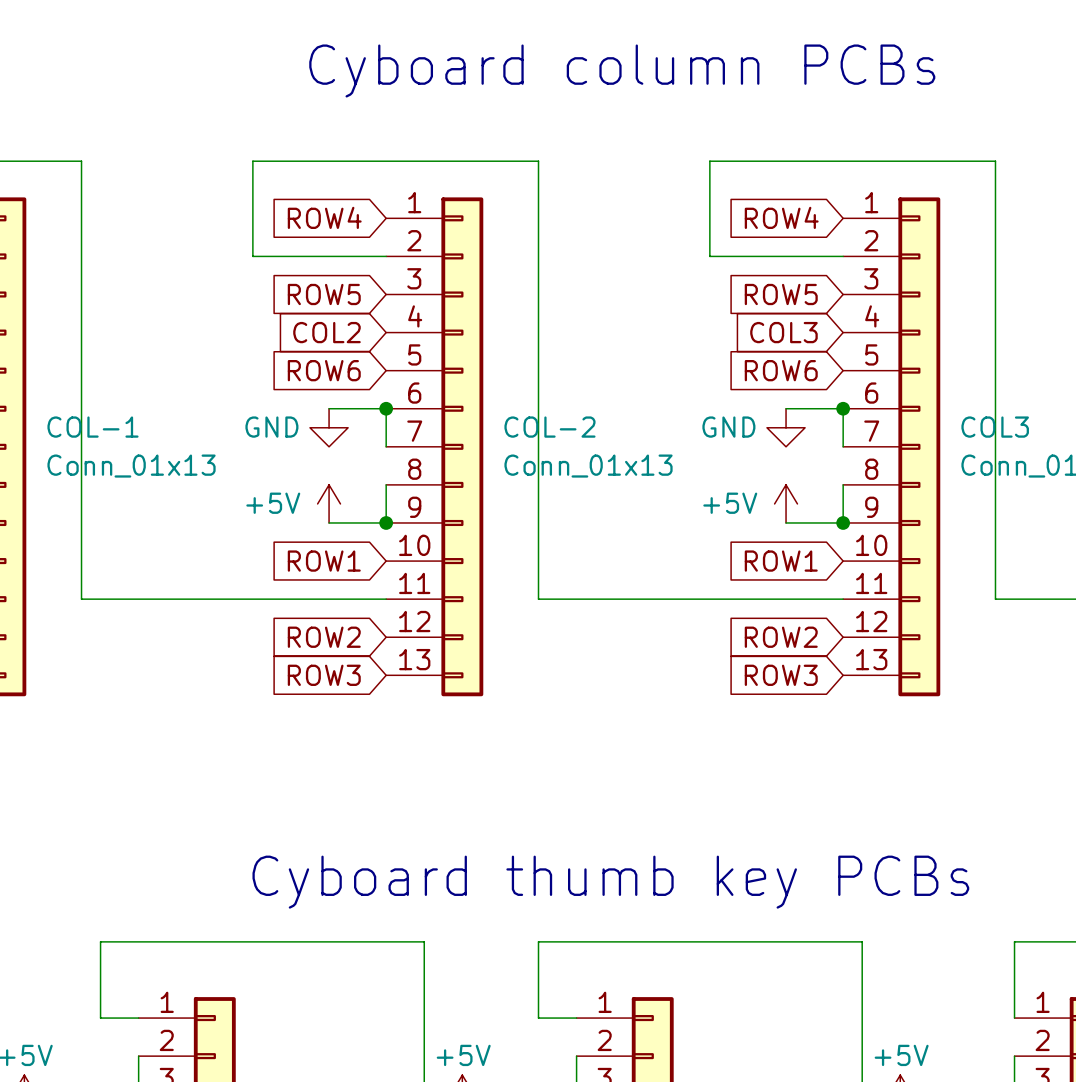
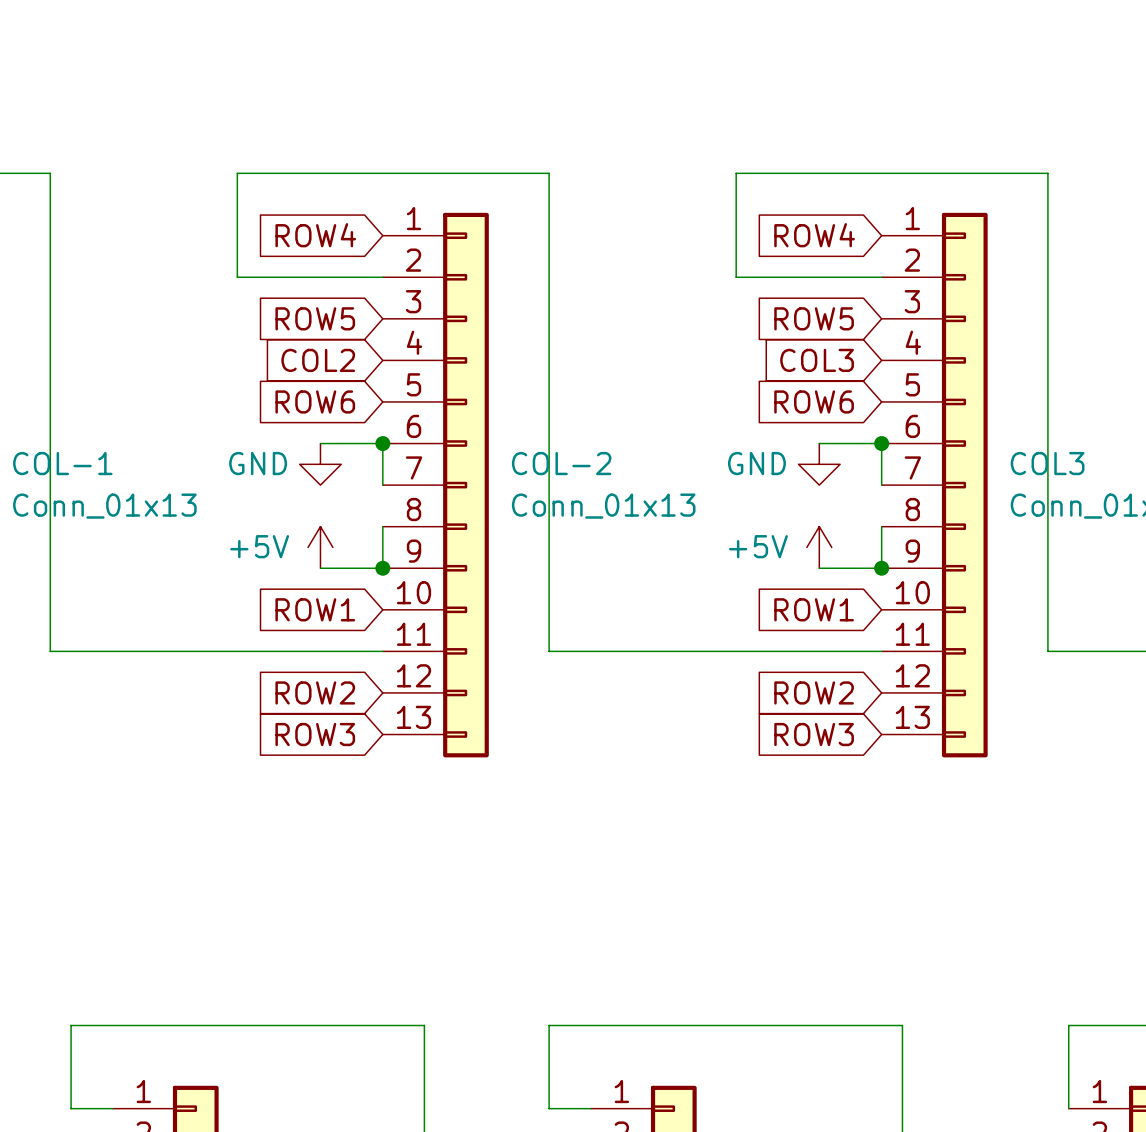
text: Cyboard column PCBs (622, 70) -> none
text: Cyboard thumb key PCBs (610, 882) -> none

